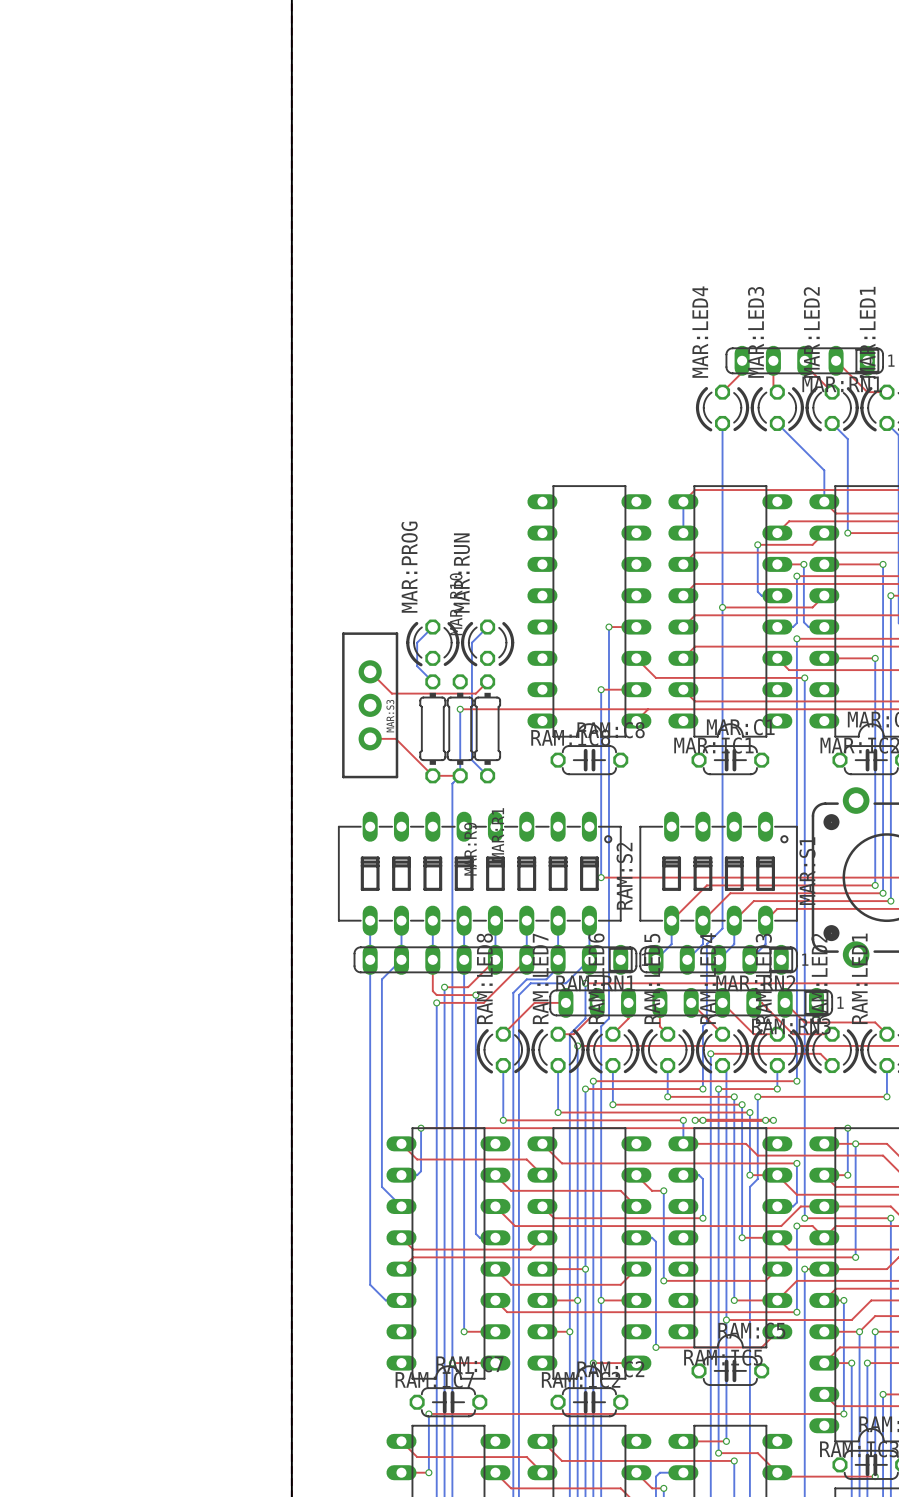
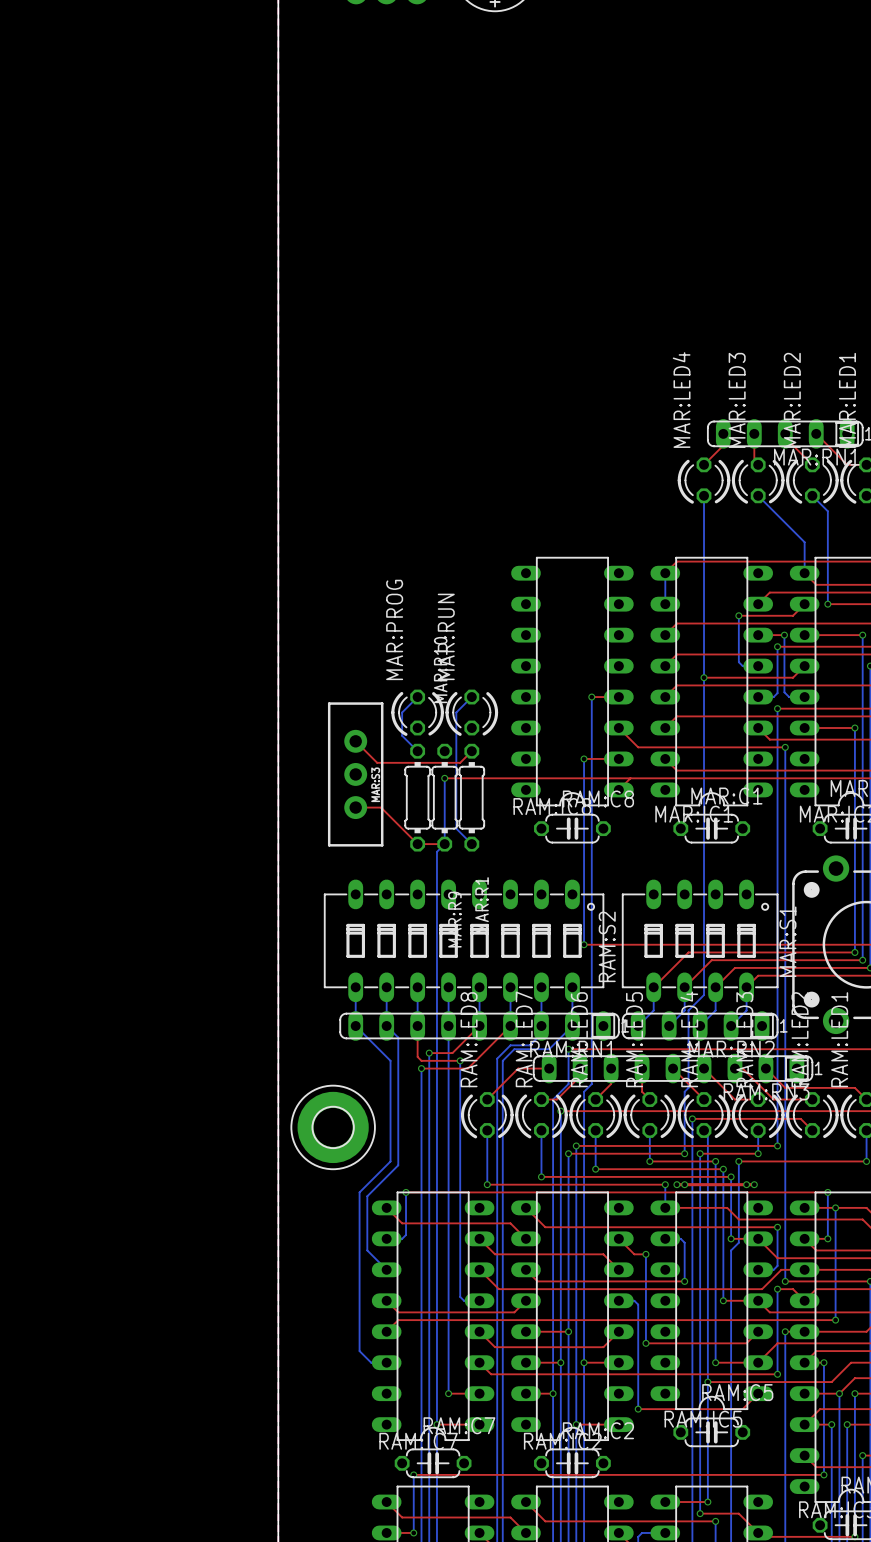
bottom track: (370, 959) (370, 1284) (374, 1288) -> (355, 1026) (390, 1060) (390, 1161) (359, 1192) (359, 1351)
bottom track: (401, 959) (381, 979) (381, 1132) -> (386, 1026) (398, 1037) (398, 1165) (367, 1196)
part: none -> (333, 1127)

